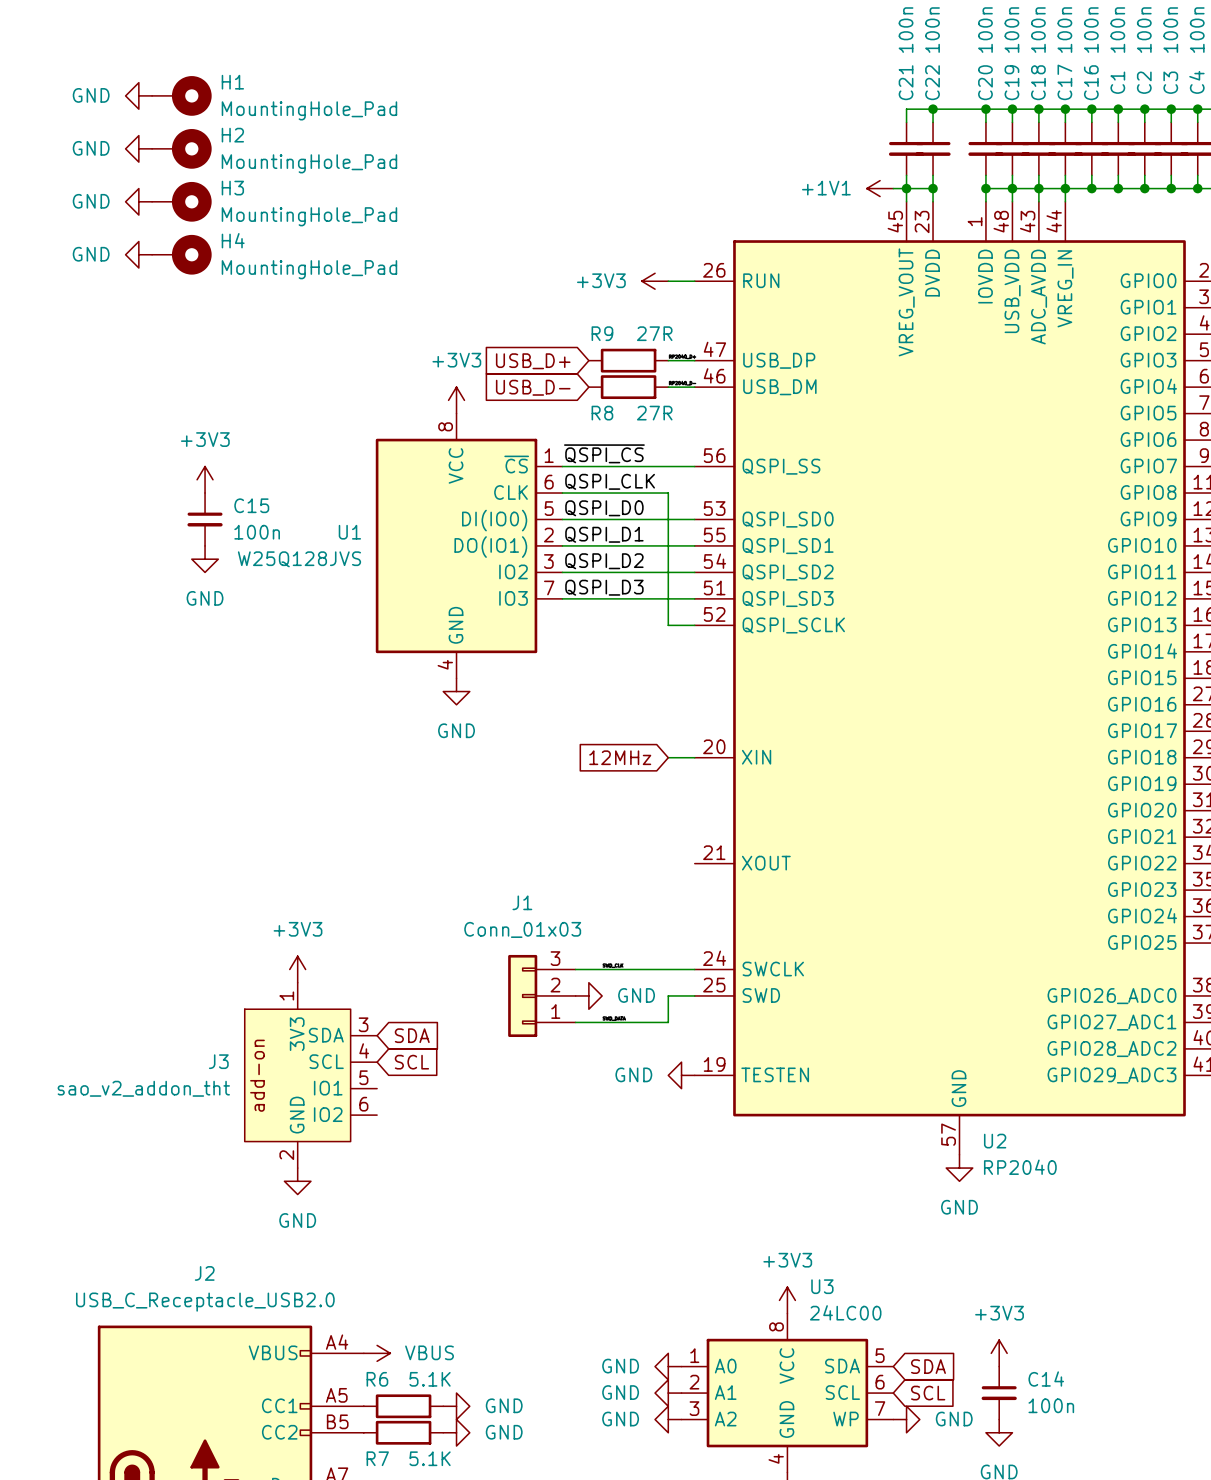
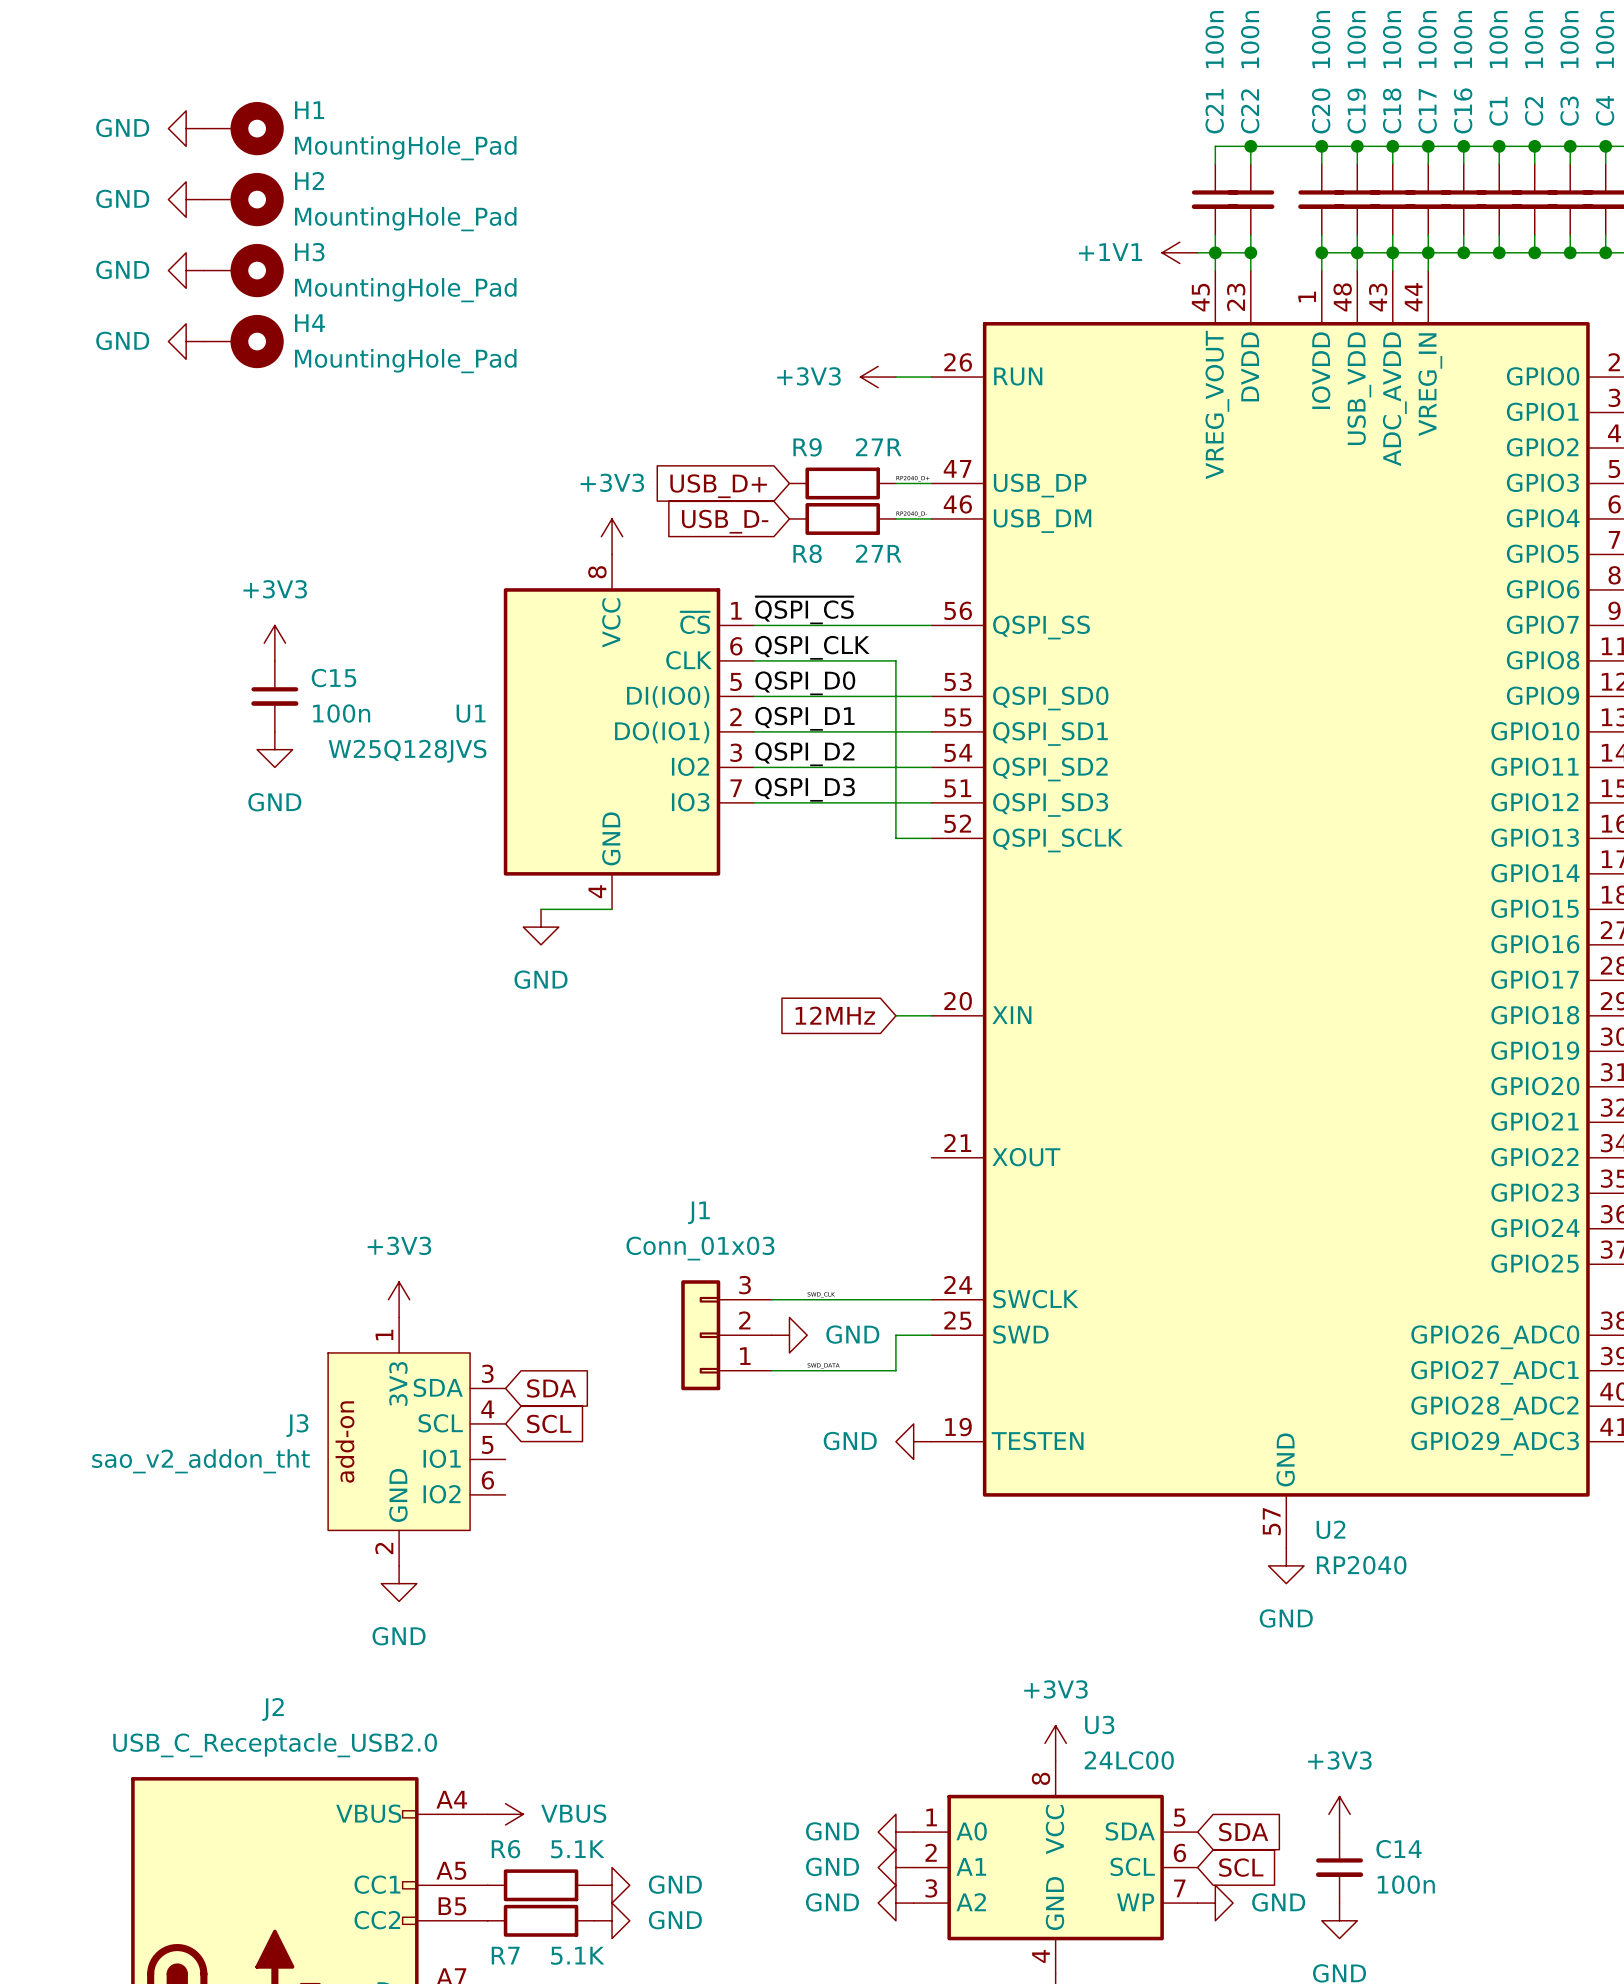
wire: none -> (541, 909) (612, 909)
power symbol position: GND (456, 691) -> GND (541, 927)

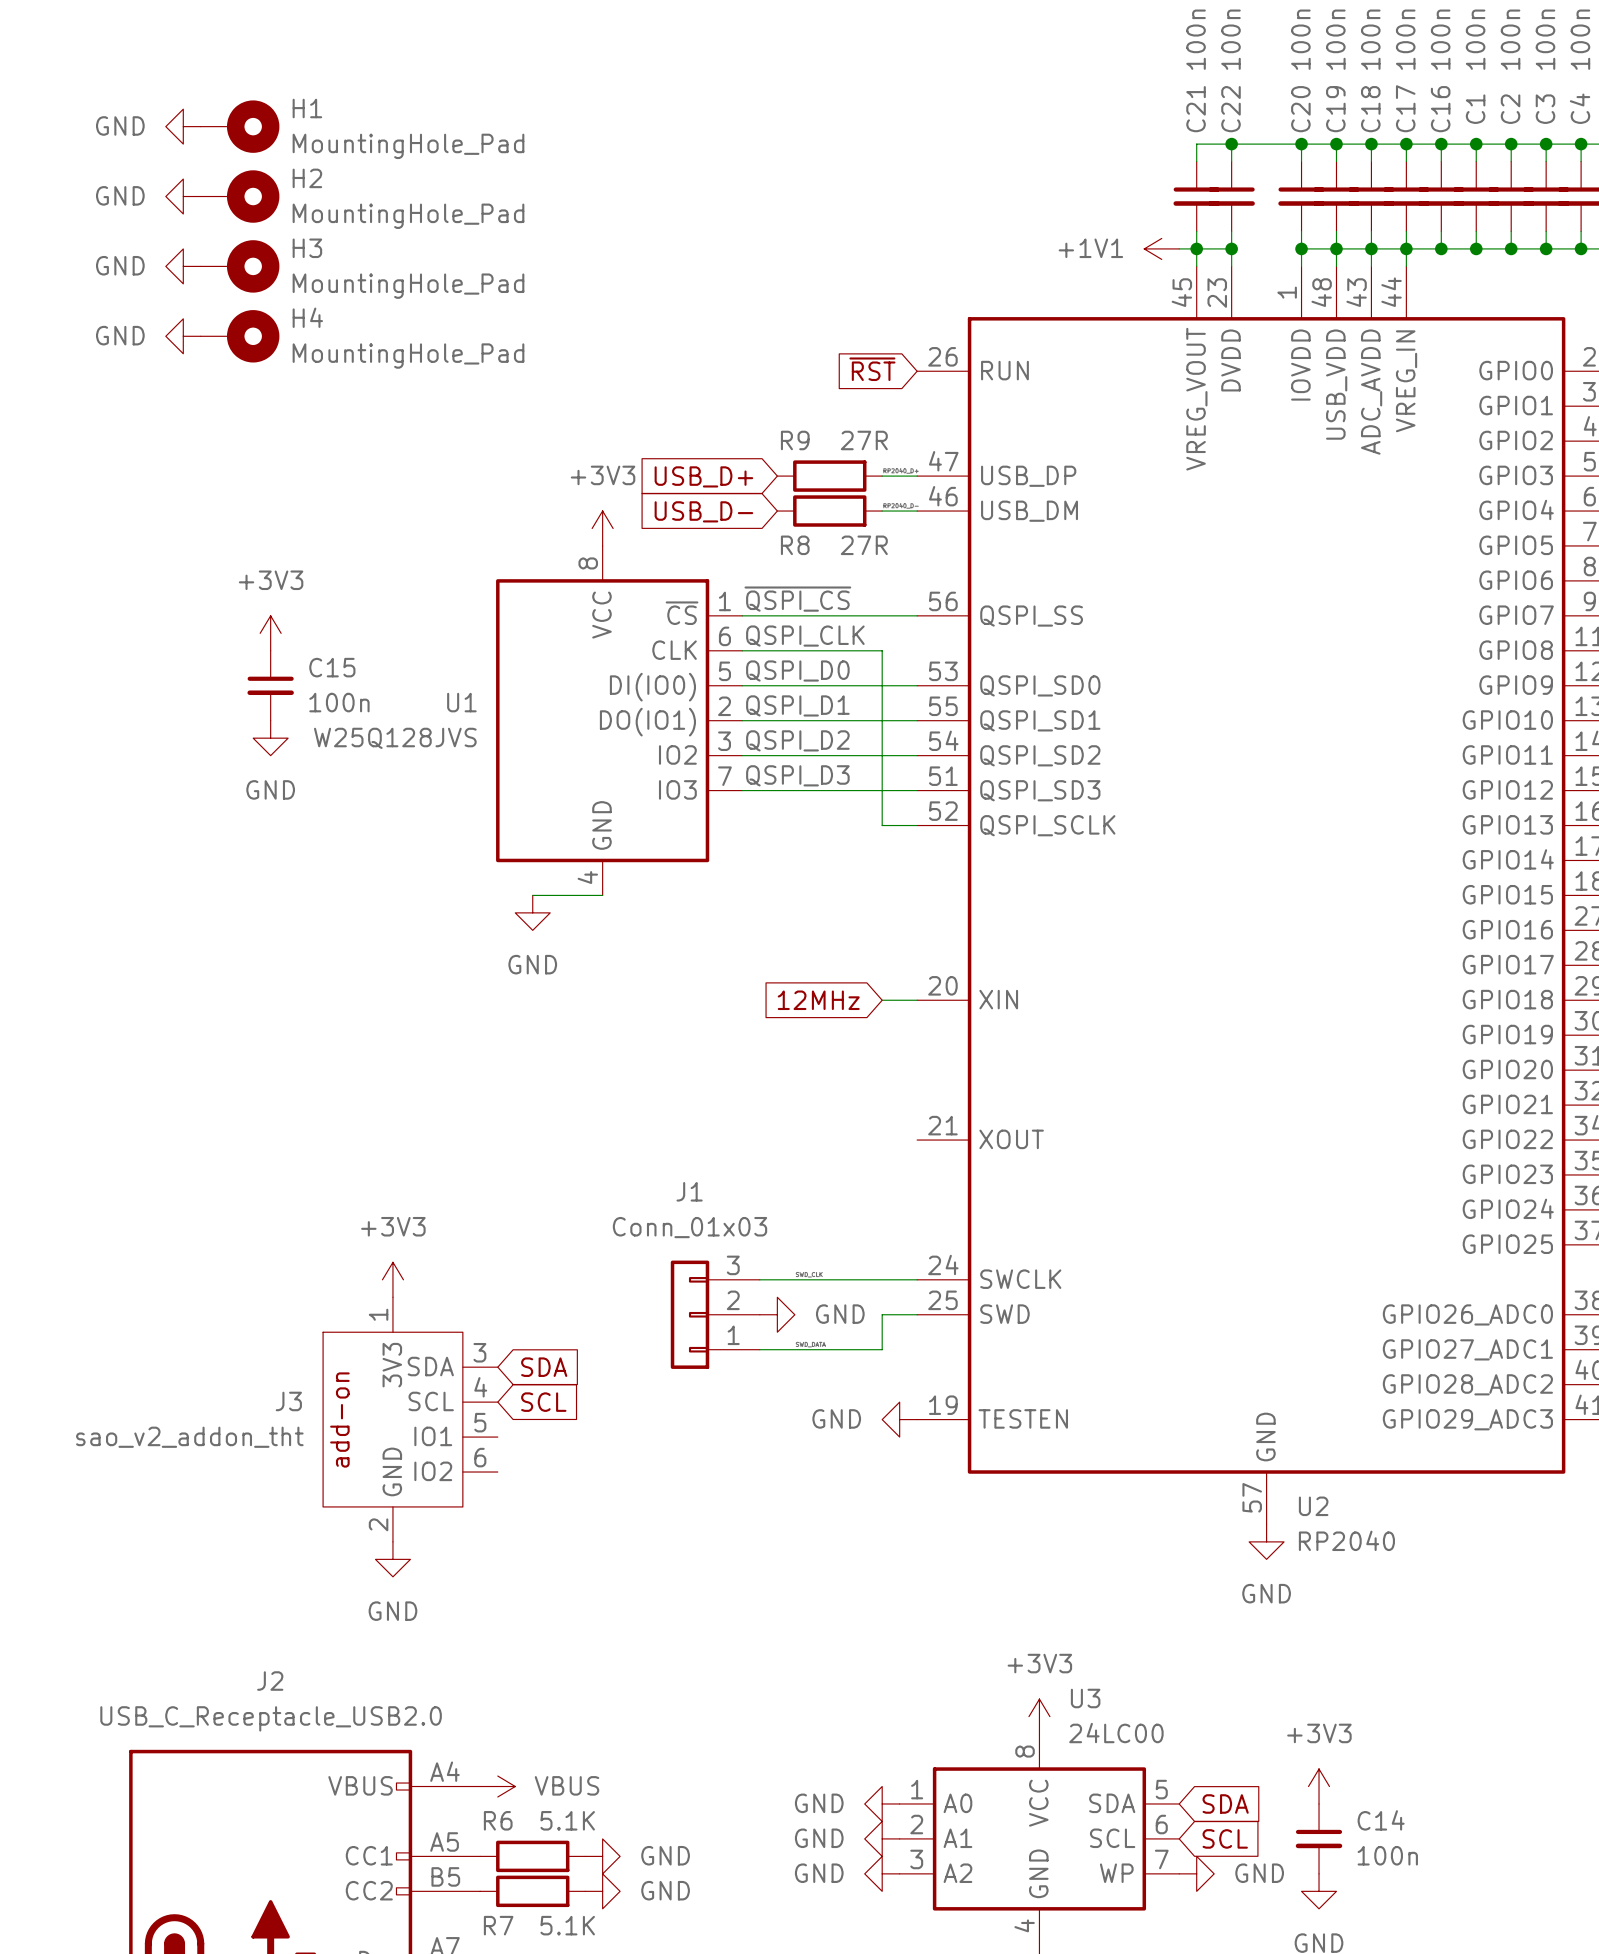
global label: none -> ~{RST} (872, 369)
power symbol: +3V3 (878, 377) -> none
wire: (895, 377) (931, 377) -> none

